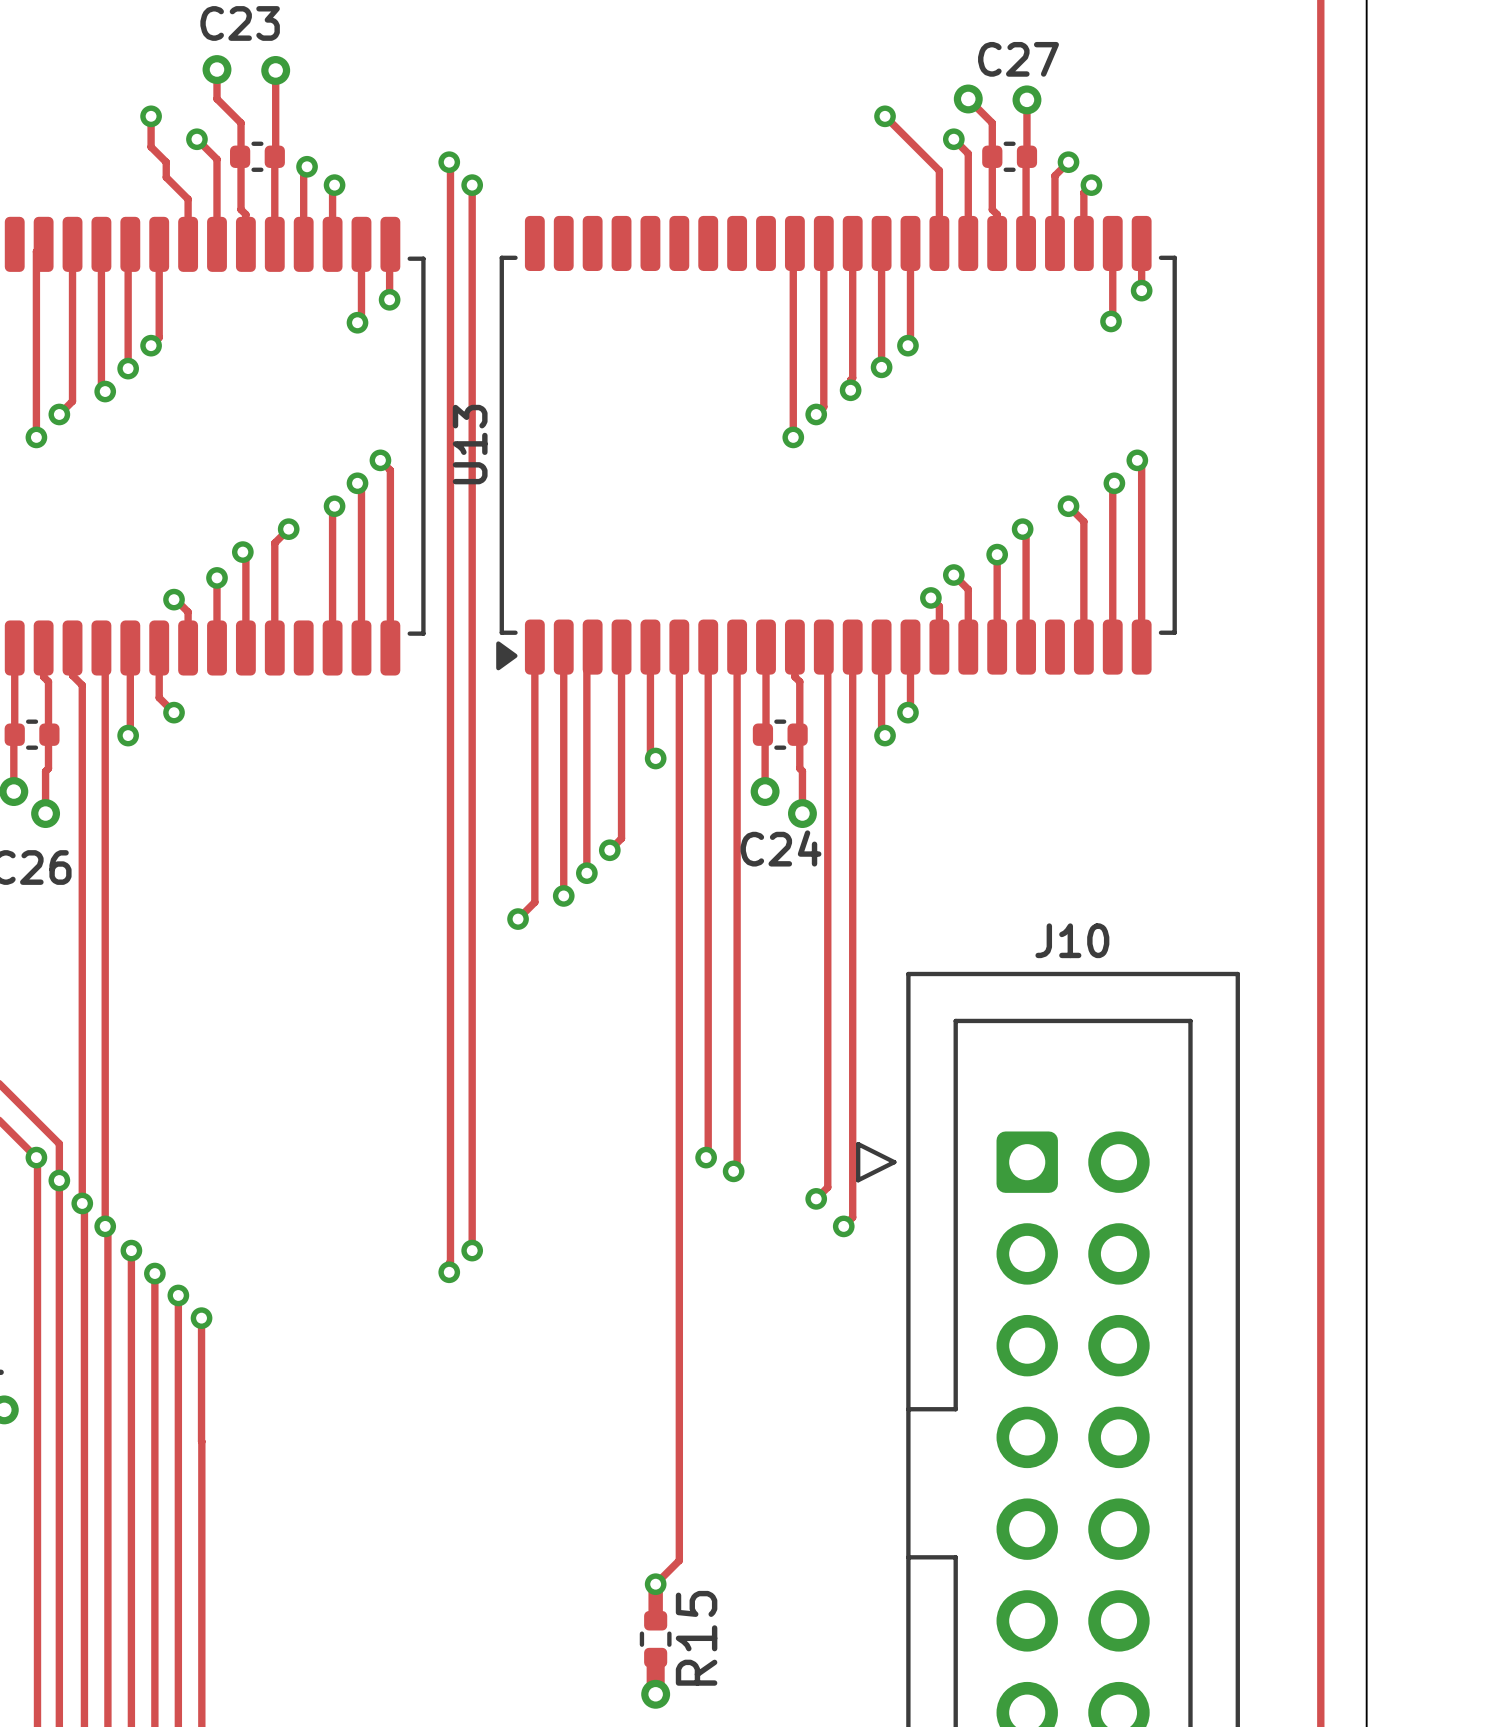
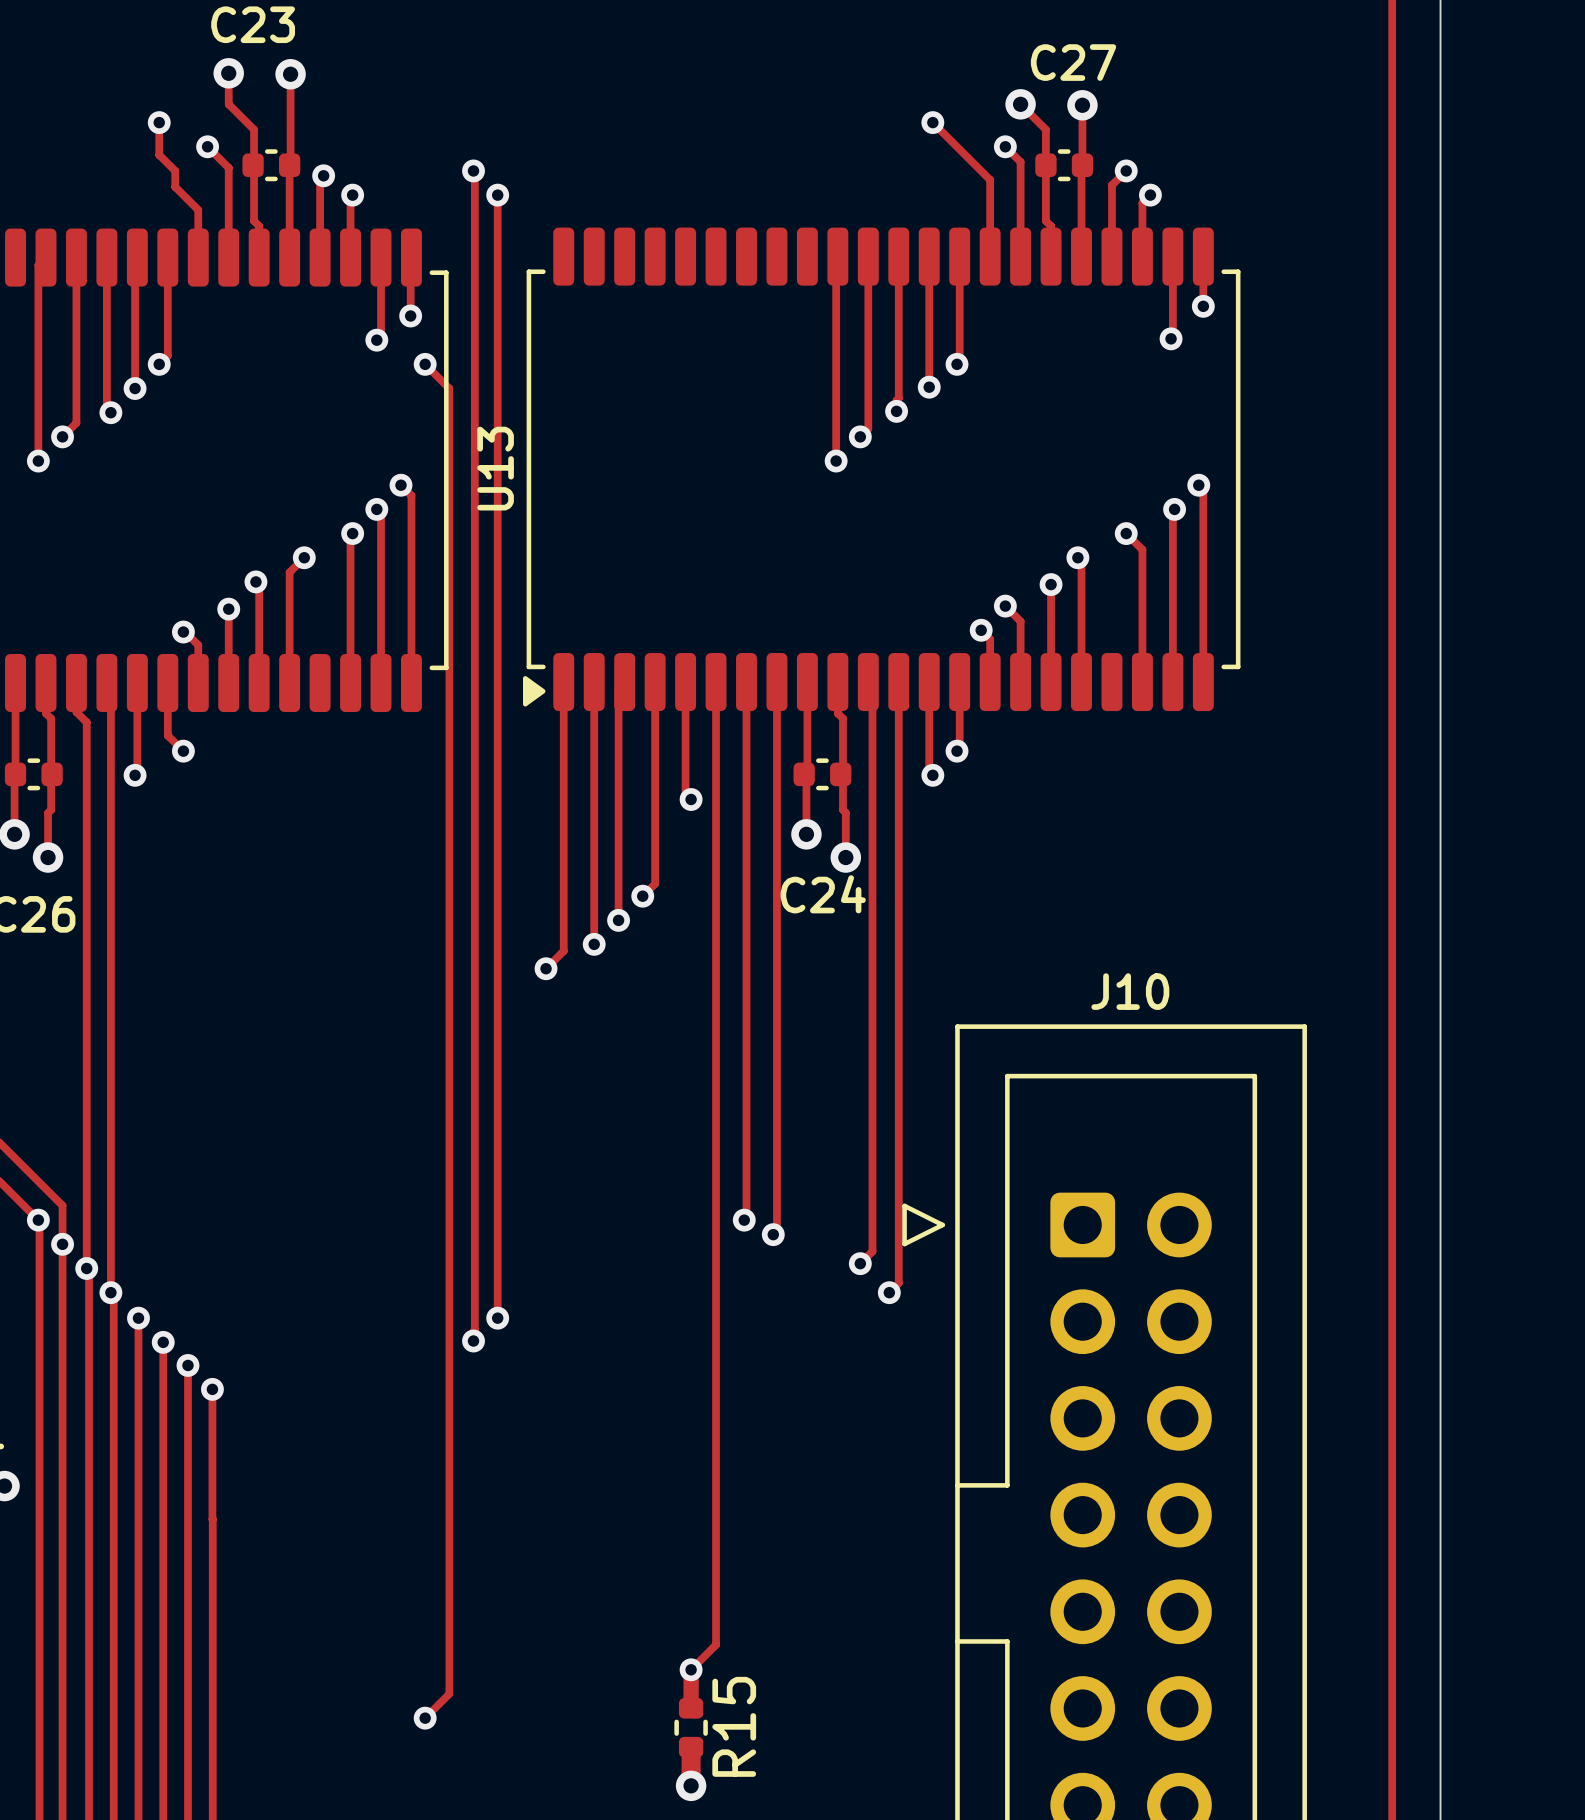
track: none -> (425, 364) (449, 388) (449, 1693) (425, 1718)
via: none -> (425, 364)
via: none -> (425, 1718)

